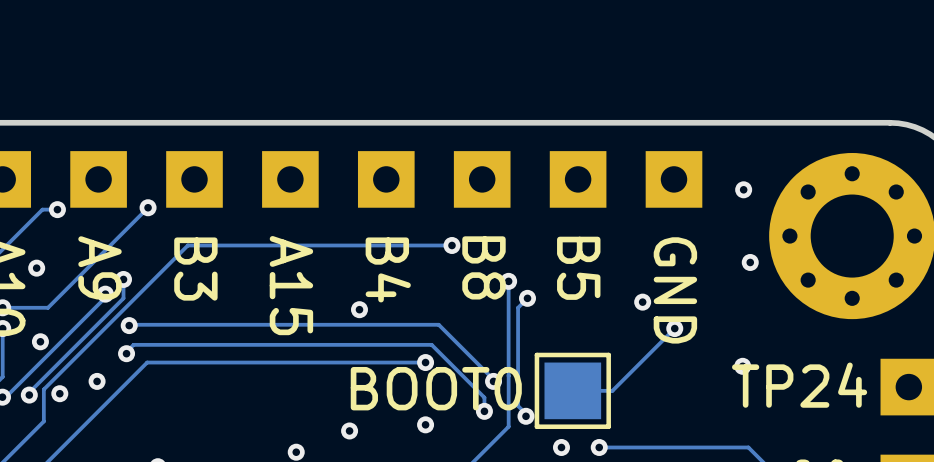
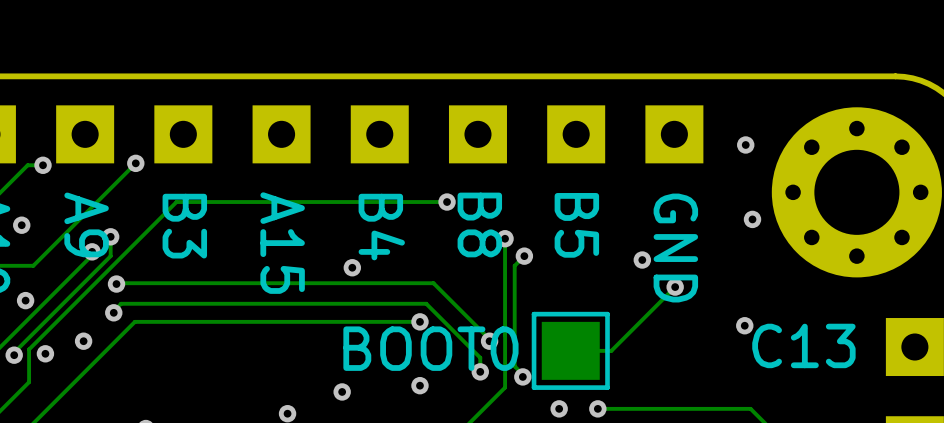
TP24 name: TP24 (799, 385) -> C13 (803, 345)

